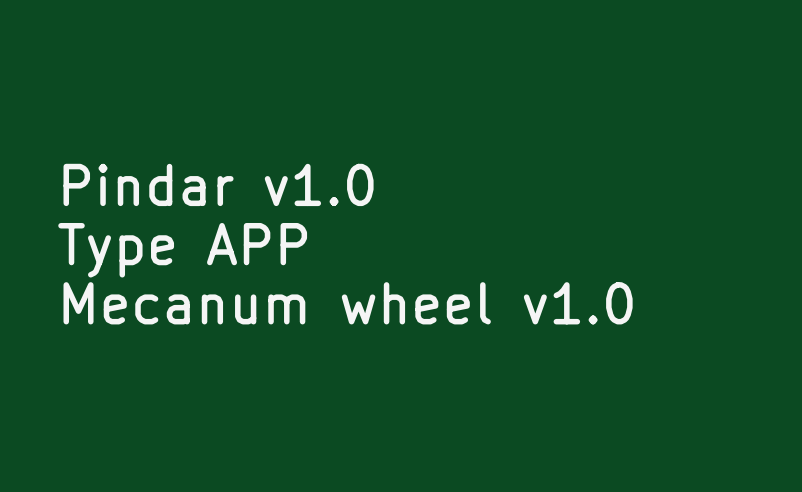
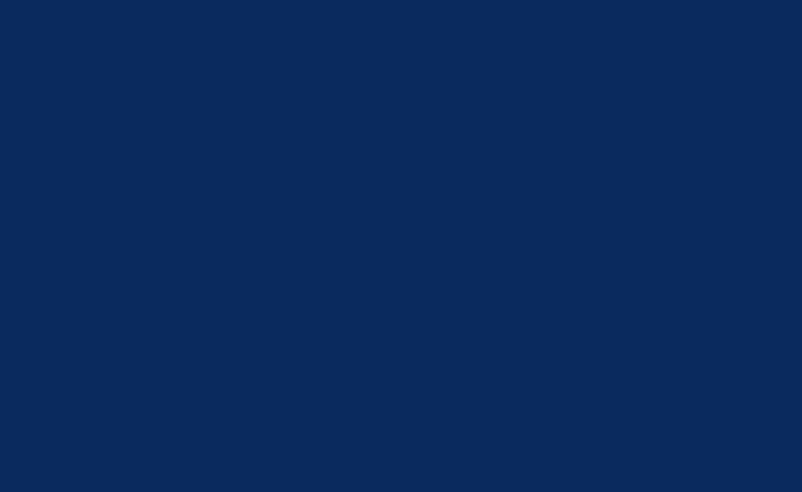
text: Pindar v1.0 (218, 184) -> none
text: Type APP (182, 250) -> none
text: Mecanum wheel v1.0 (348, 303) -> none

